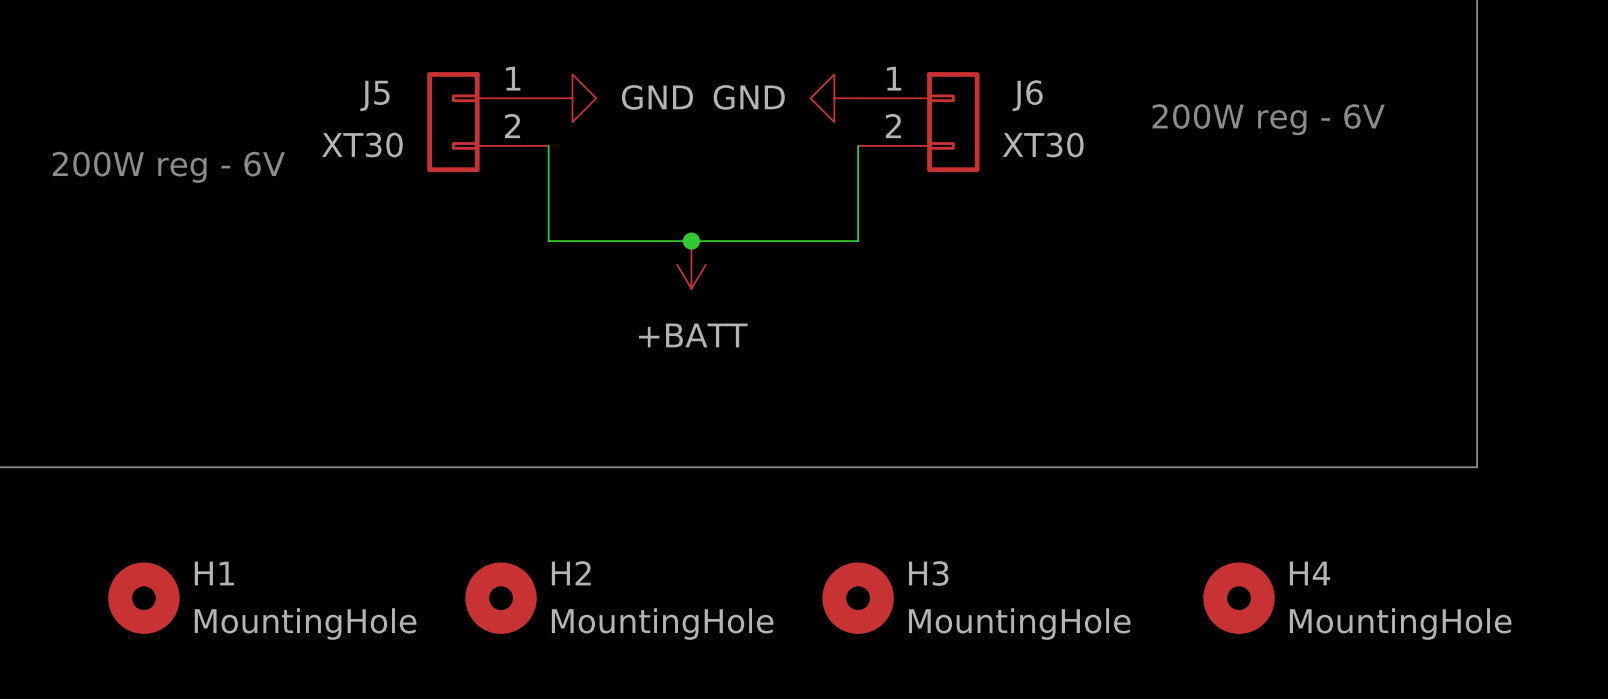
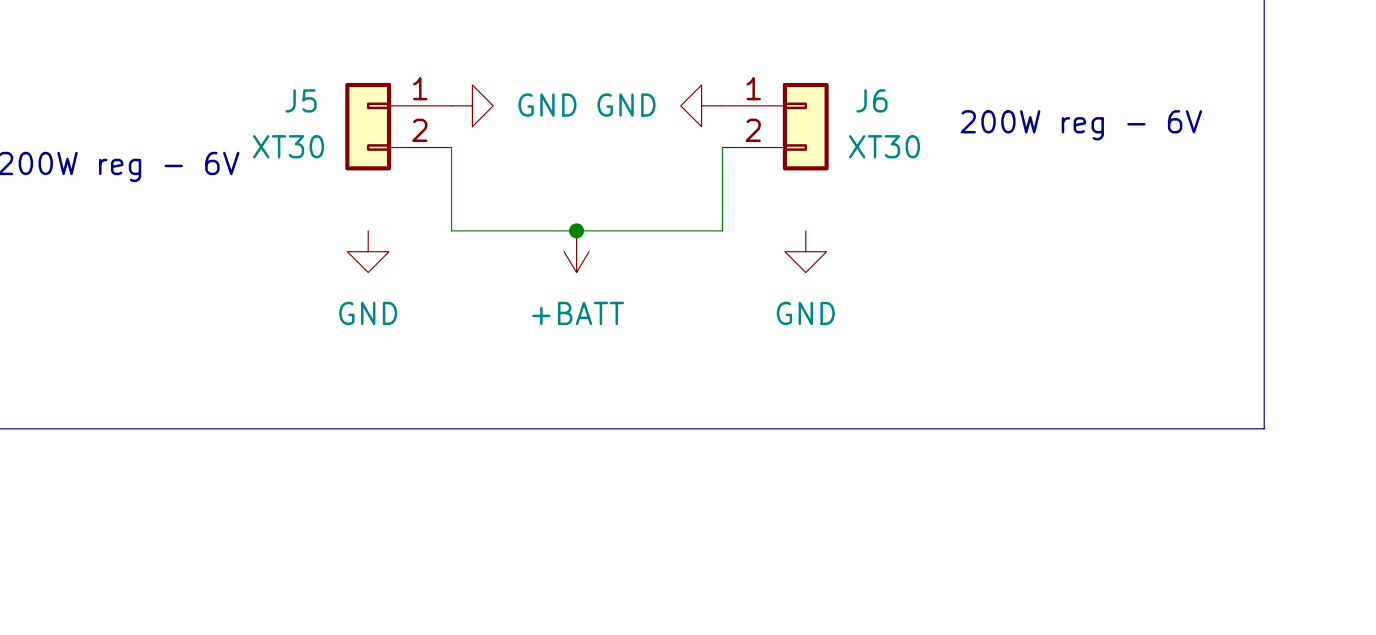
power symbol: none -> GND (368, 251)
power symbol: none -> GND (805, 251)
H1: MountingHole (143, 598) -> none
H2: MountingHole (501, 598) -> none
H3: MountingHole (858, 598) -> none
H4: MountingHole (1239, 598) -> none

